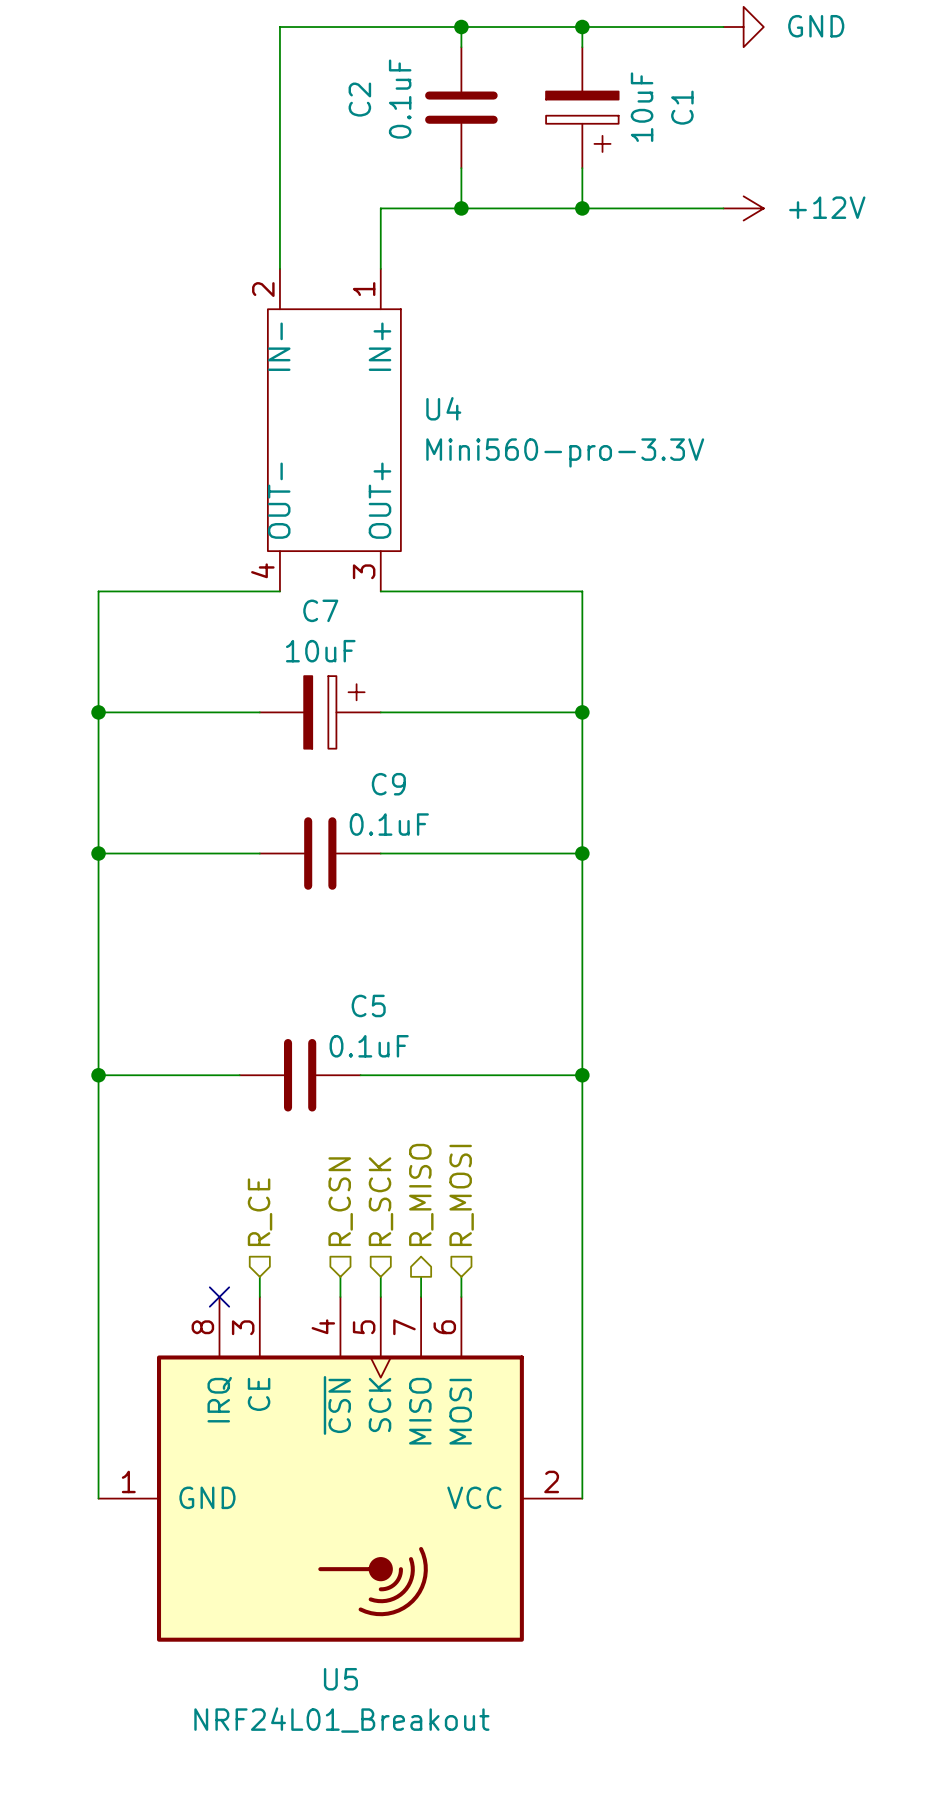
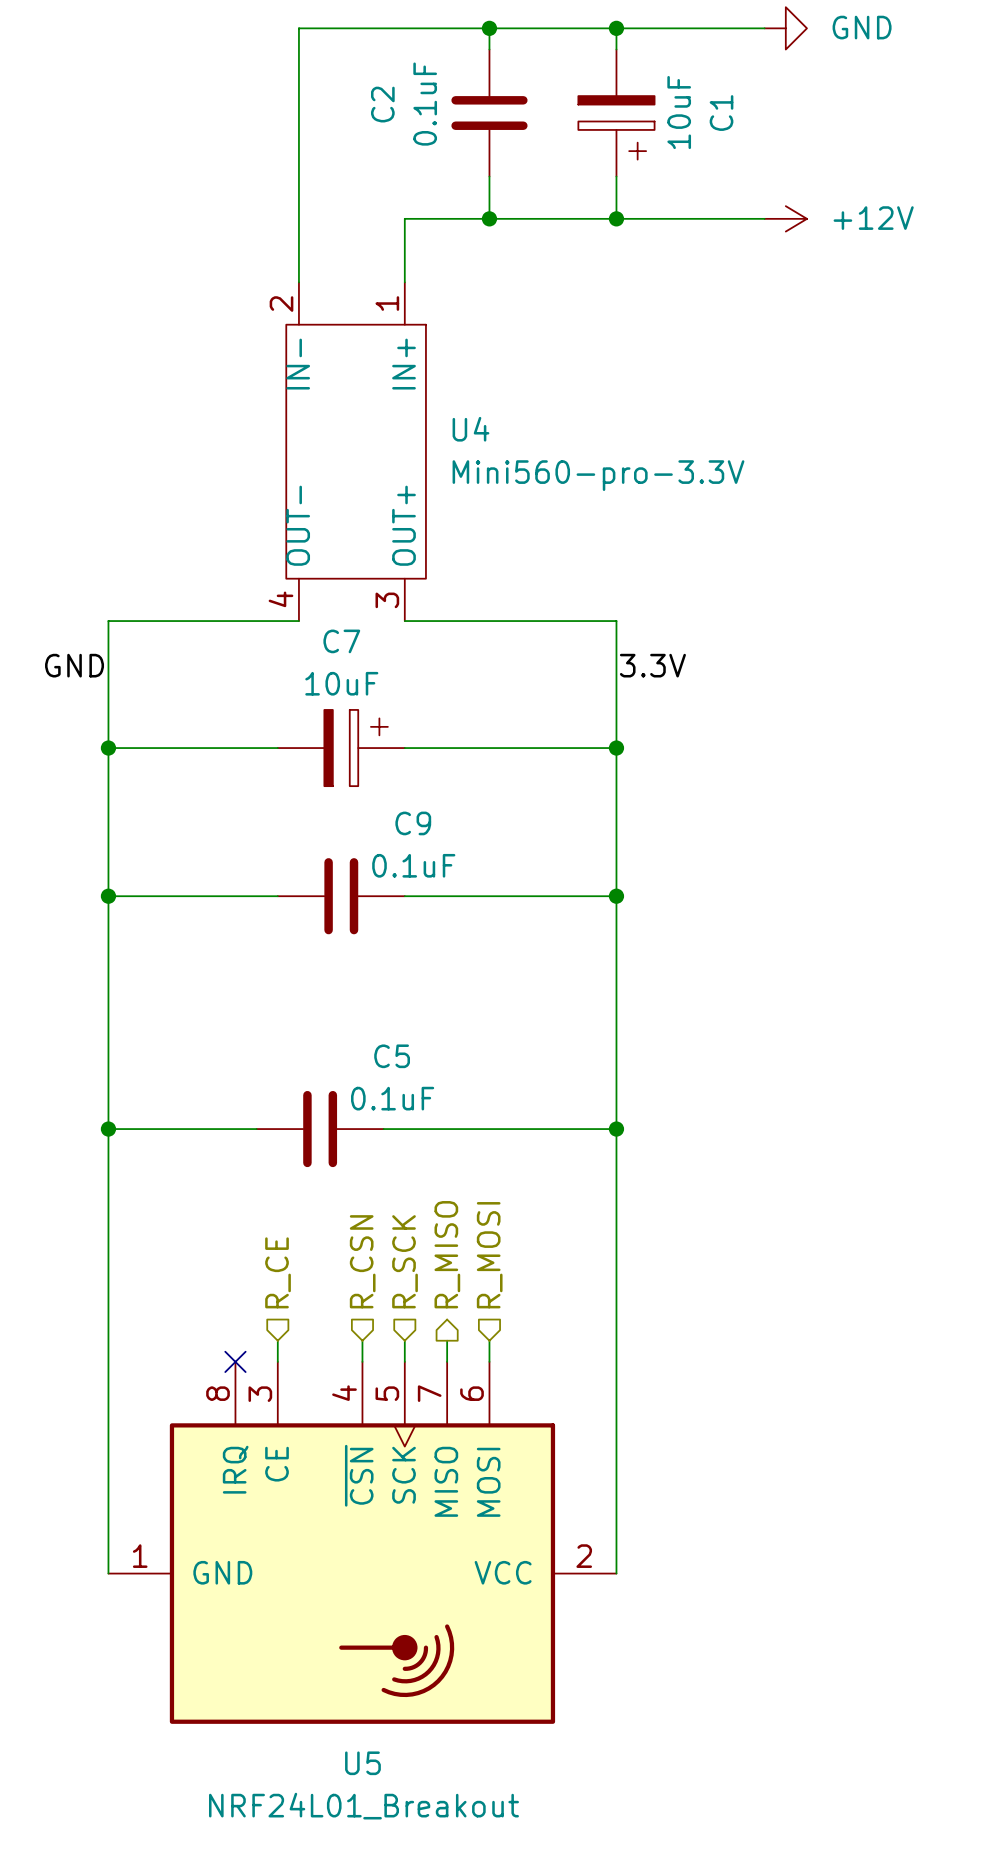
label: none -> GND (74, 665)
label: none -> 3.3V (652, 665)

